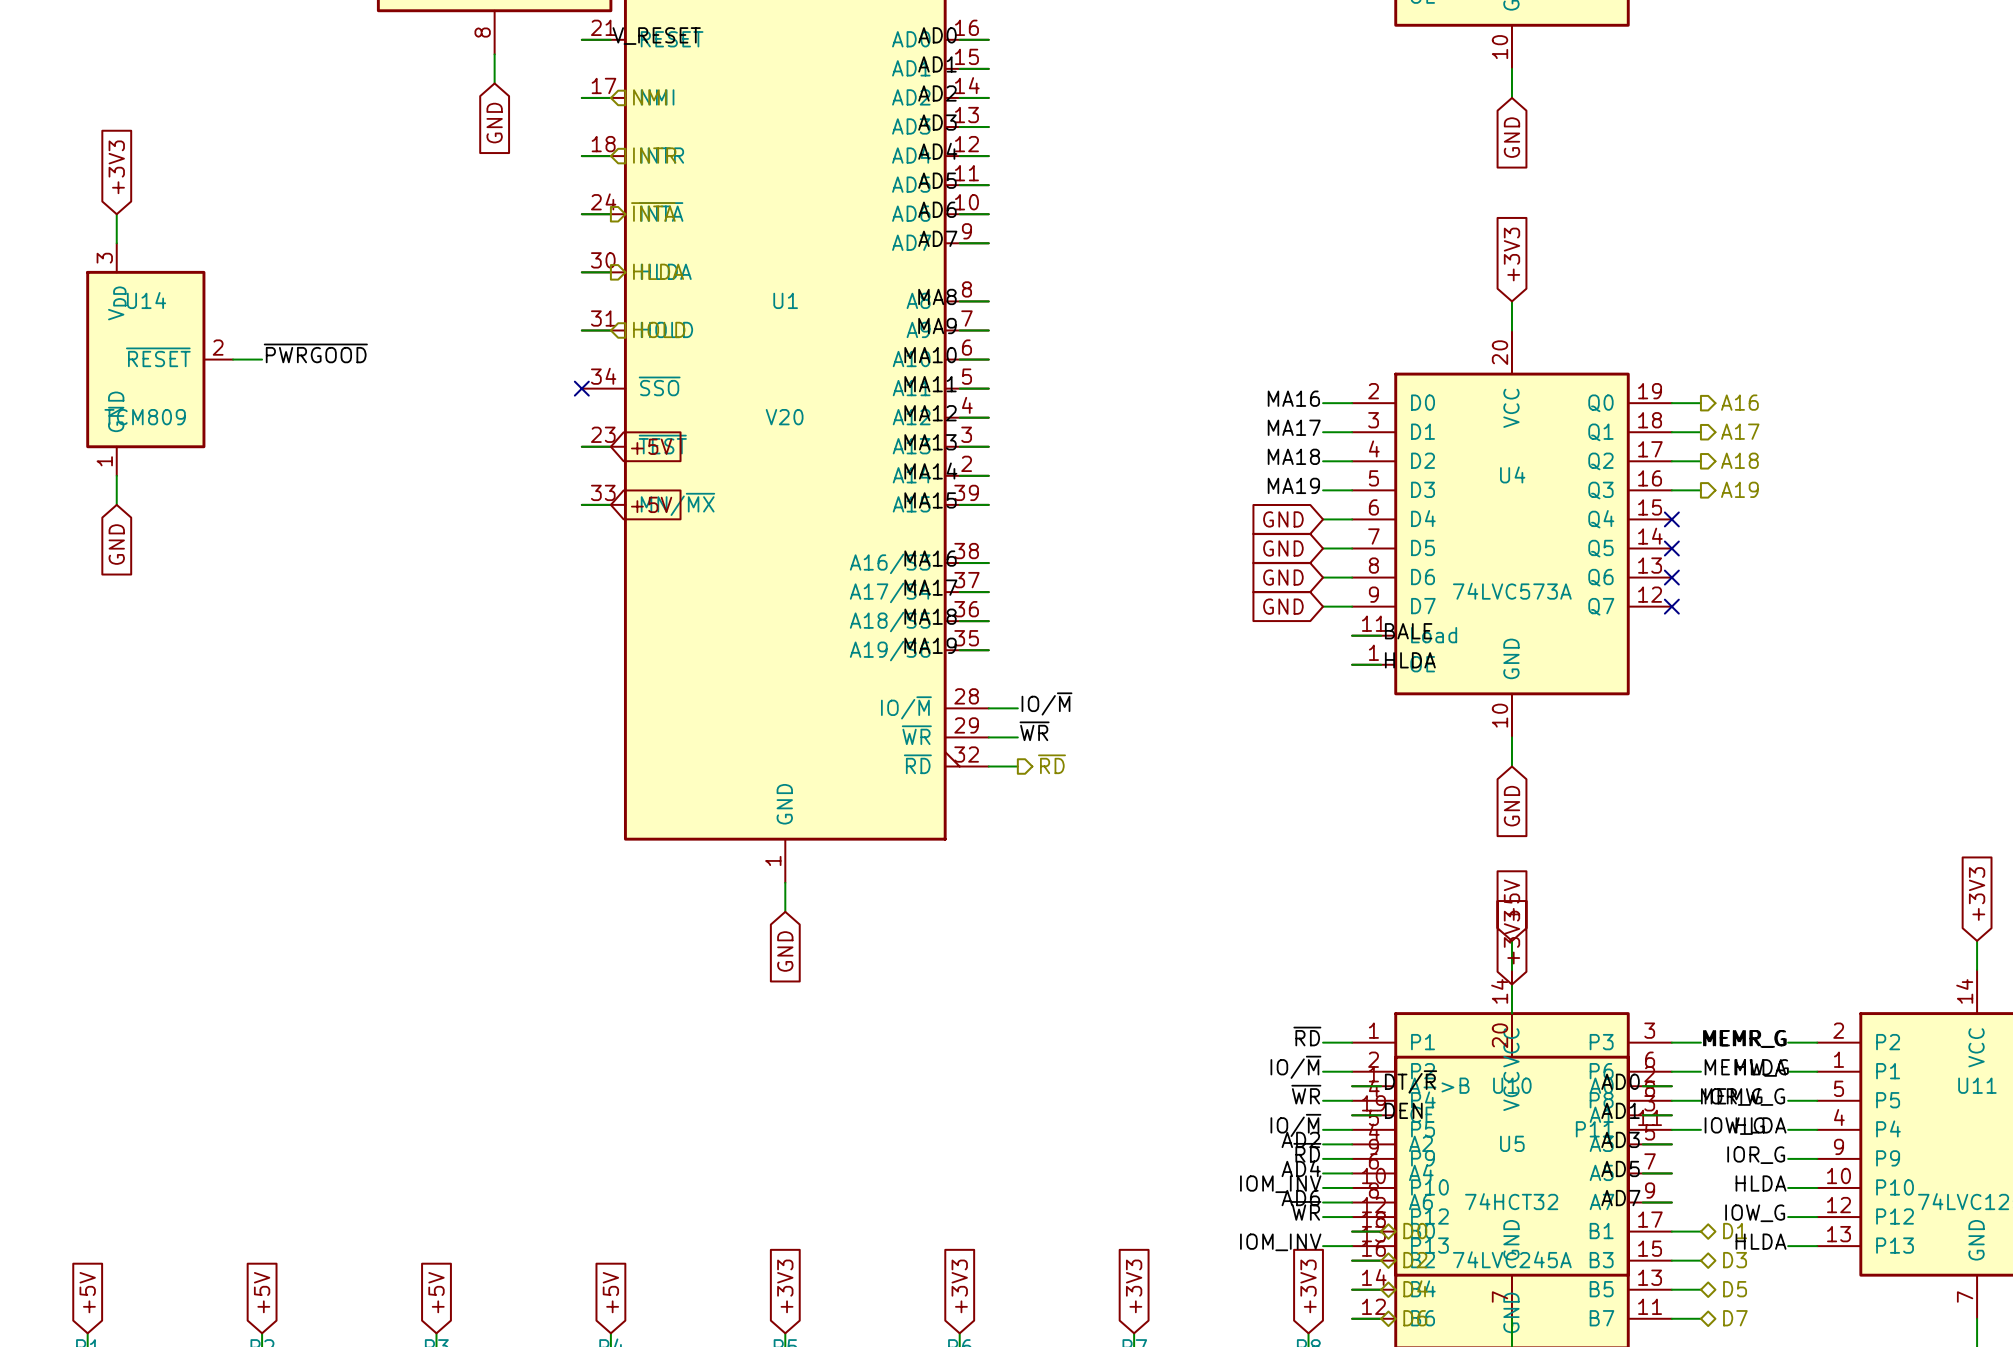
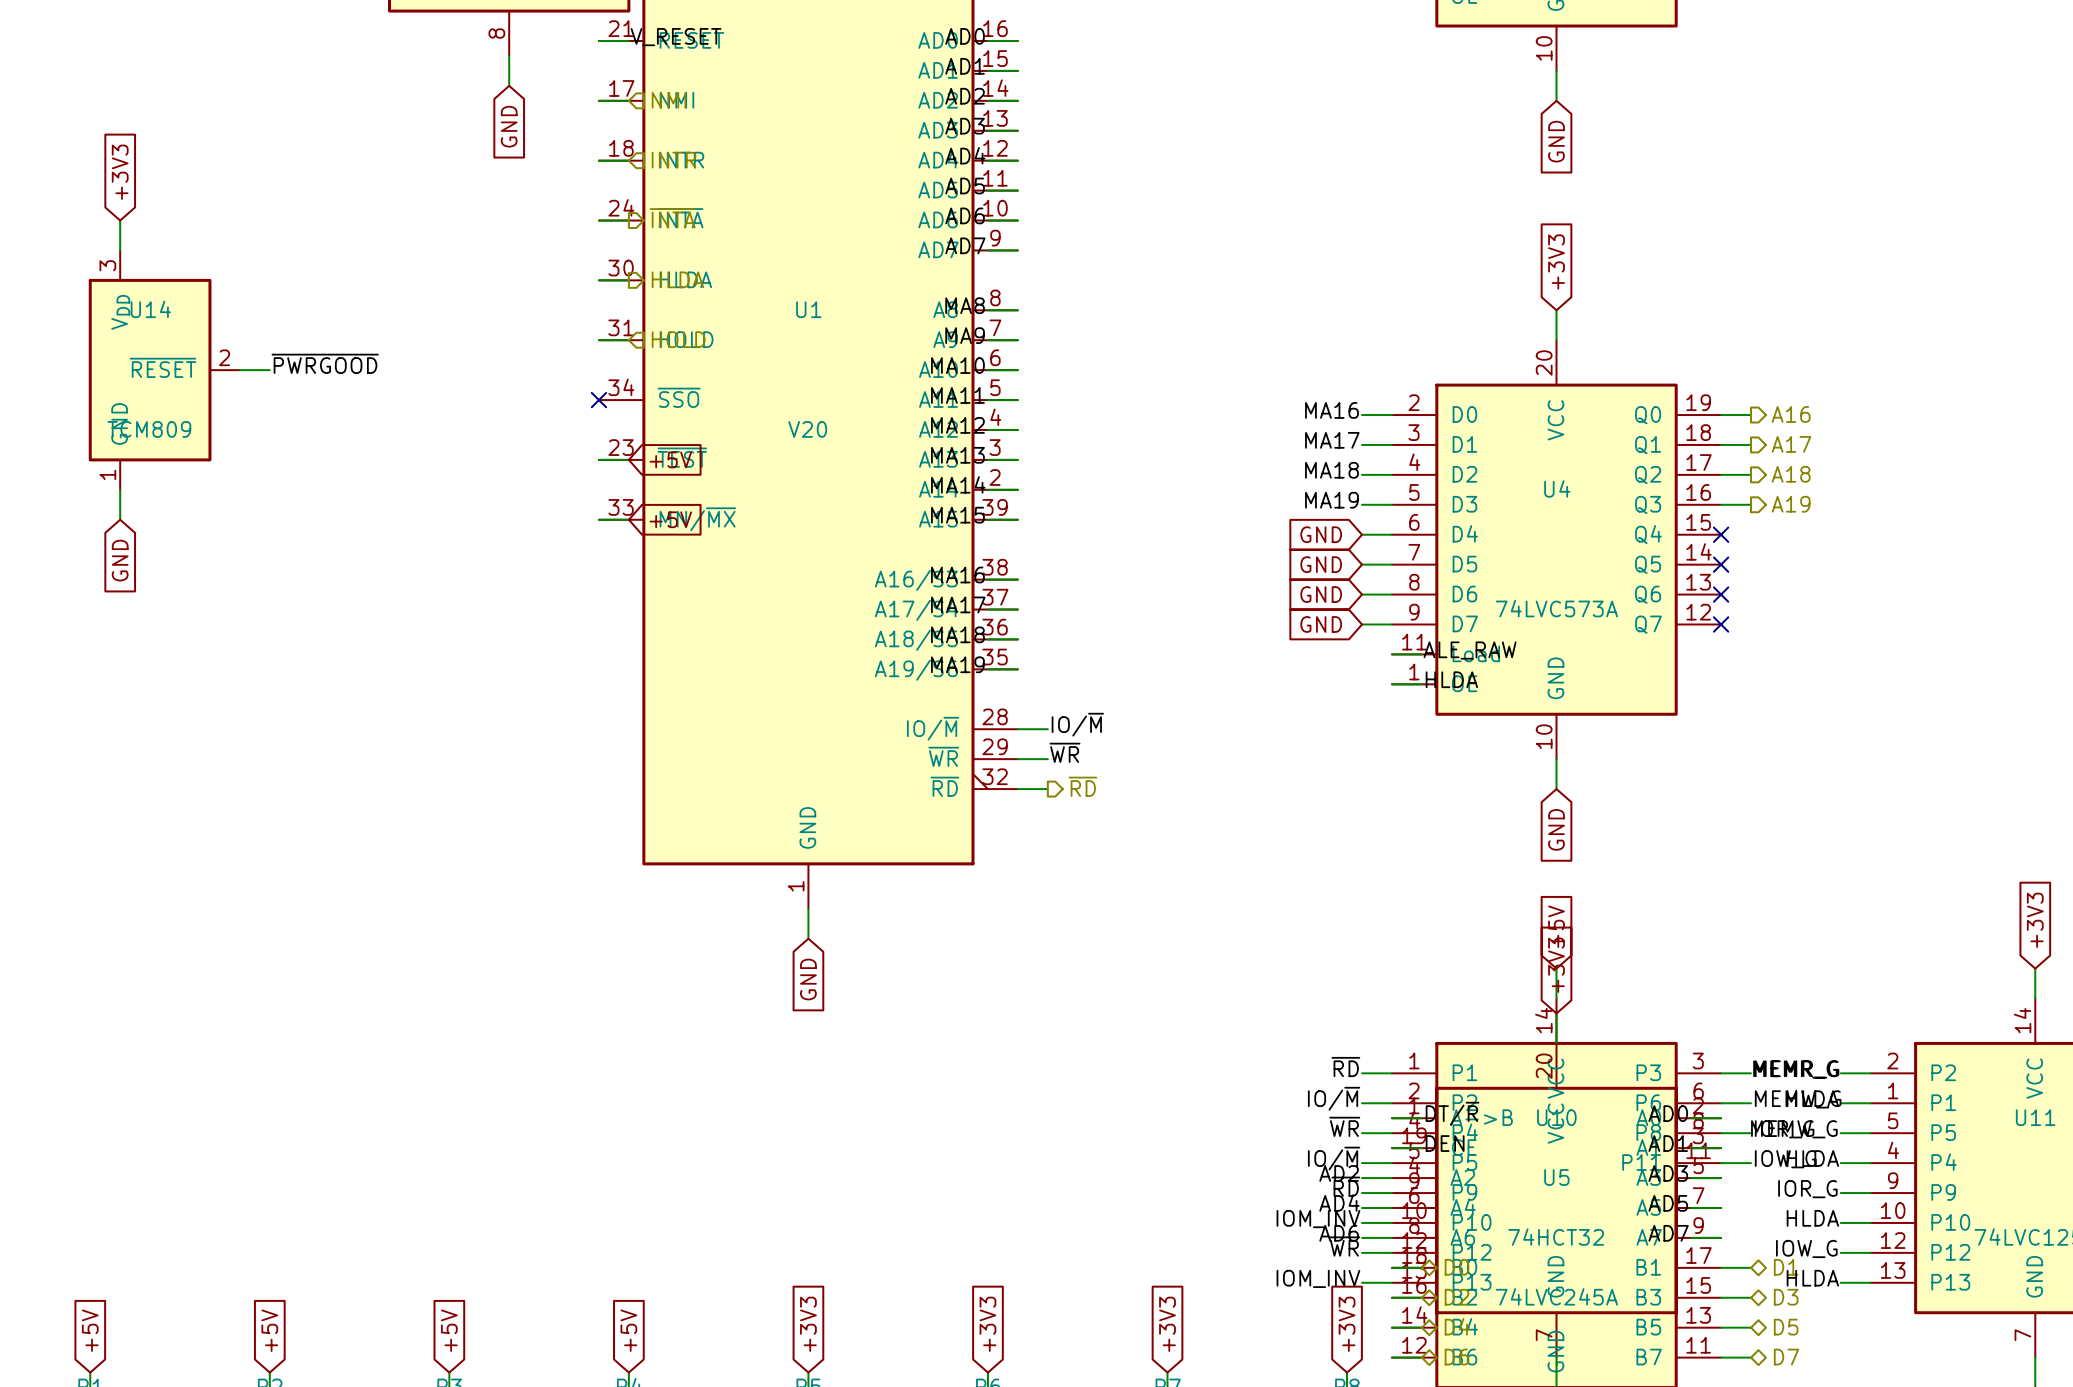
label: BALE (1408, 631) -> ALE_RAW (1470, 650)

